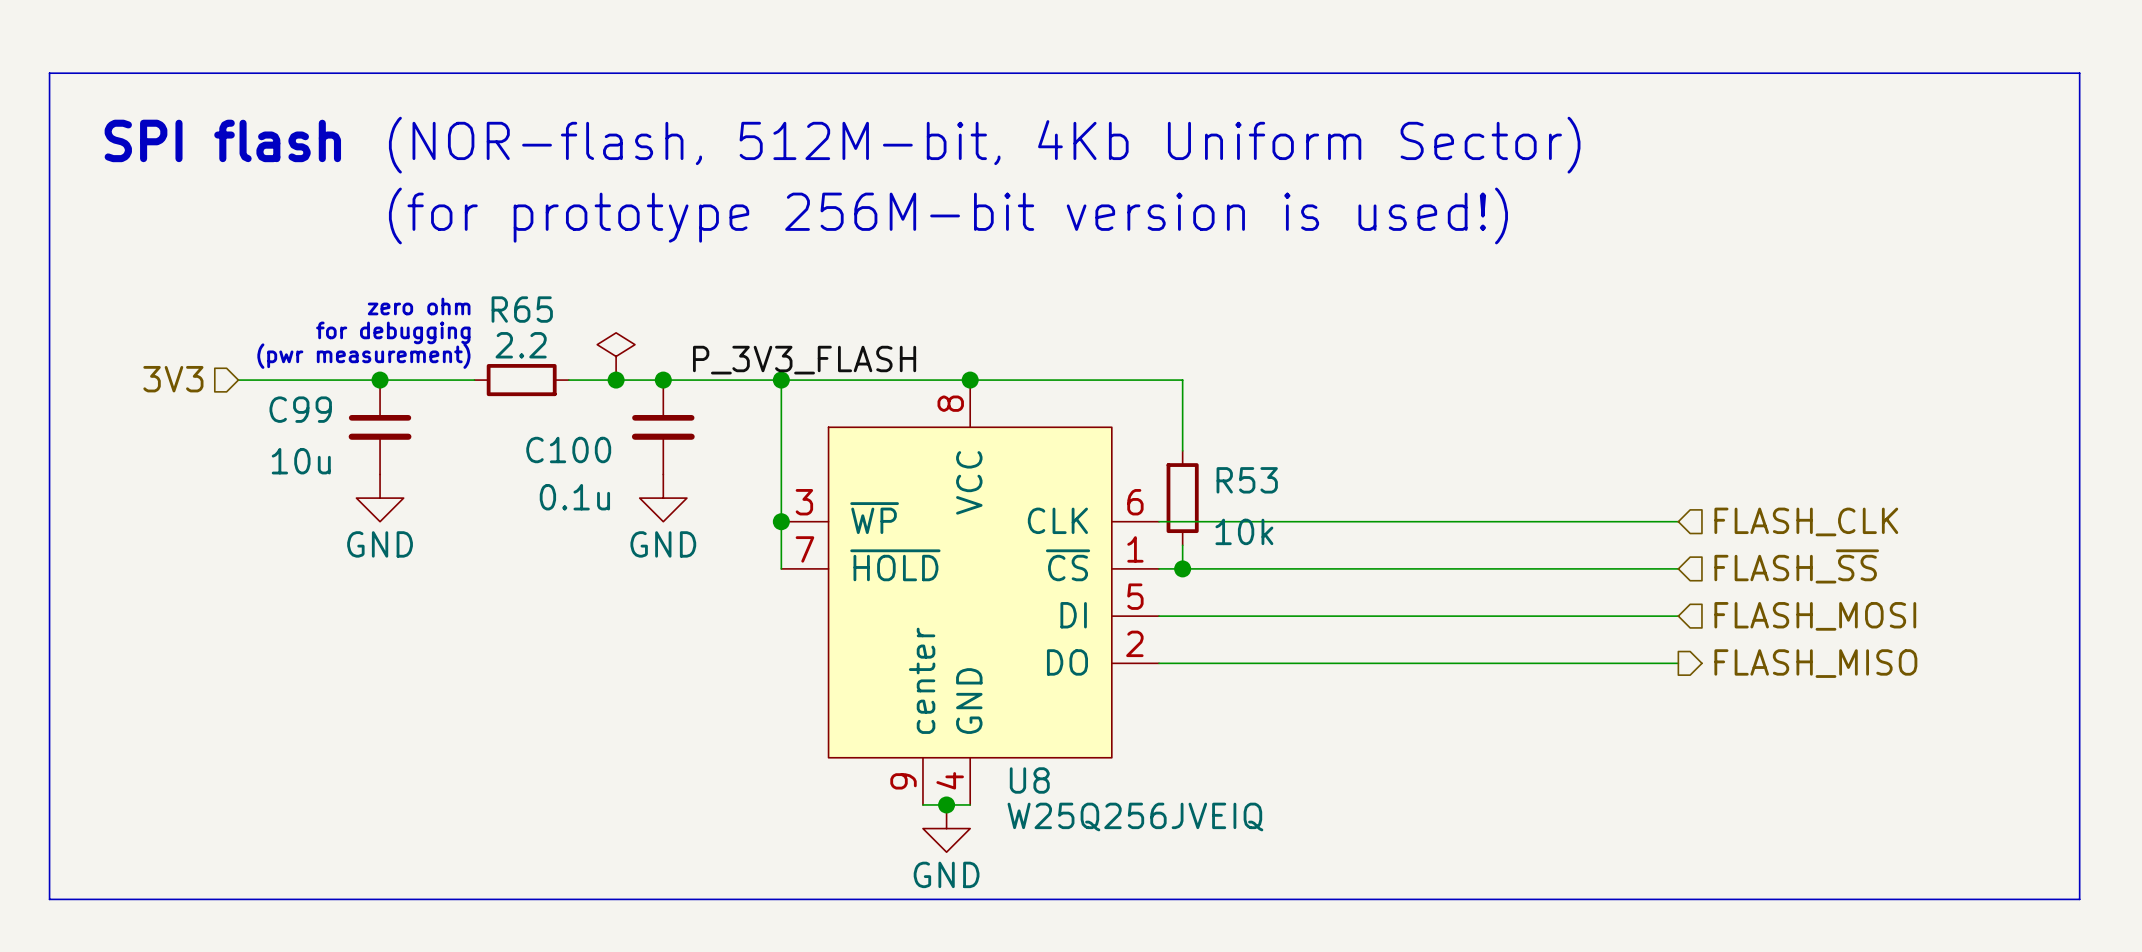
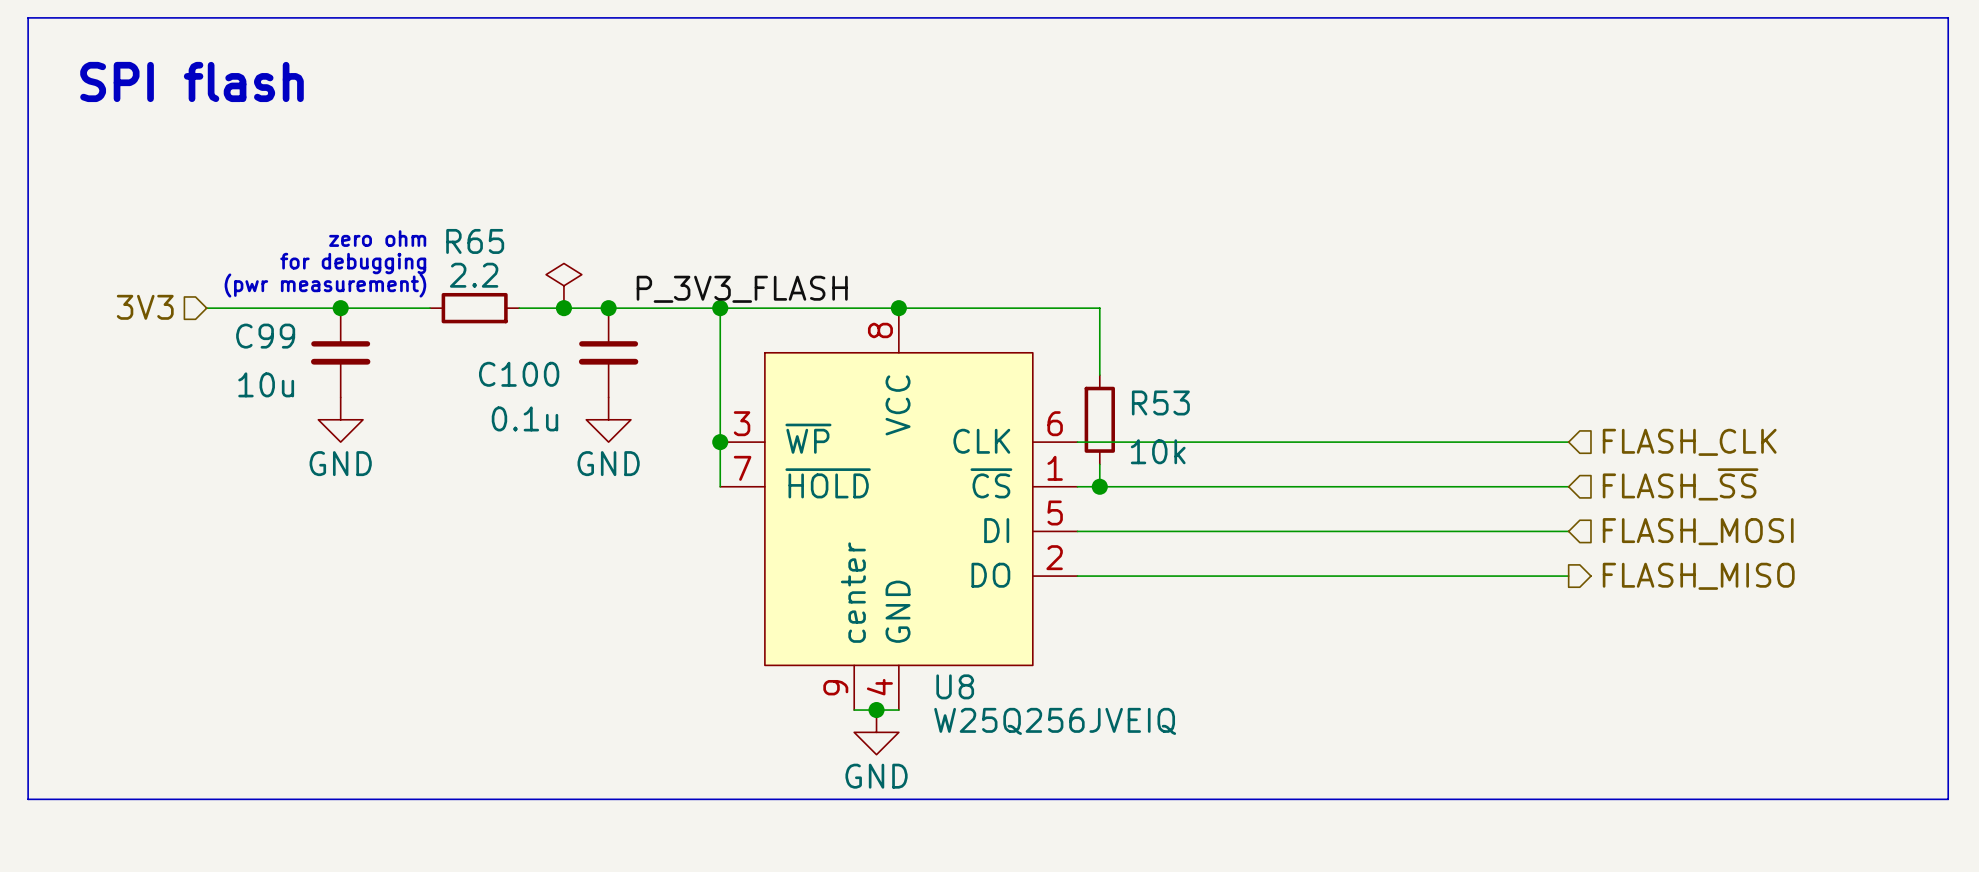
text: (NOR-flash, 512M-bit, 4Kb Uniform Sector) (984, 145) -> none
text: (for prototype 256M-bit version is used!) (948, 215) -> none

